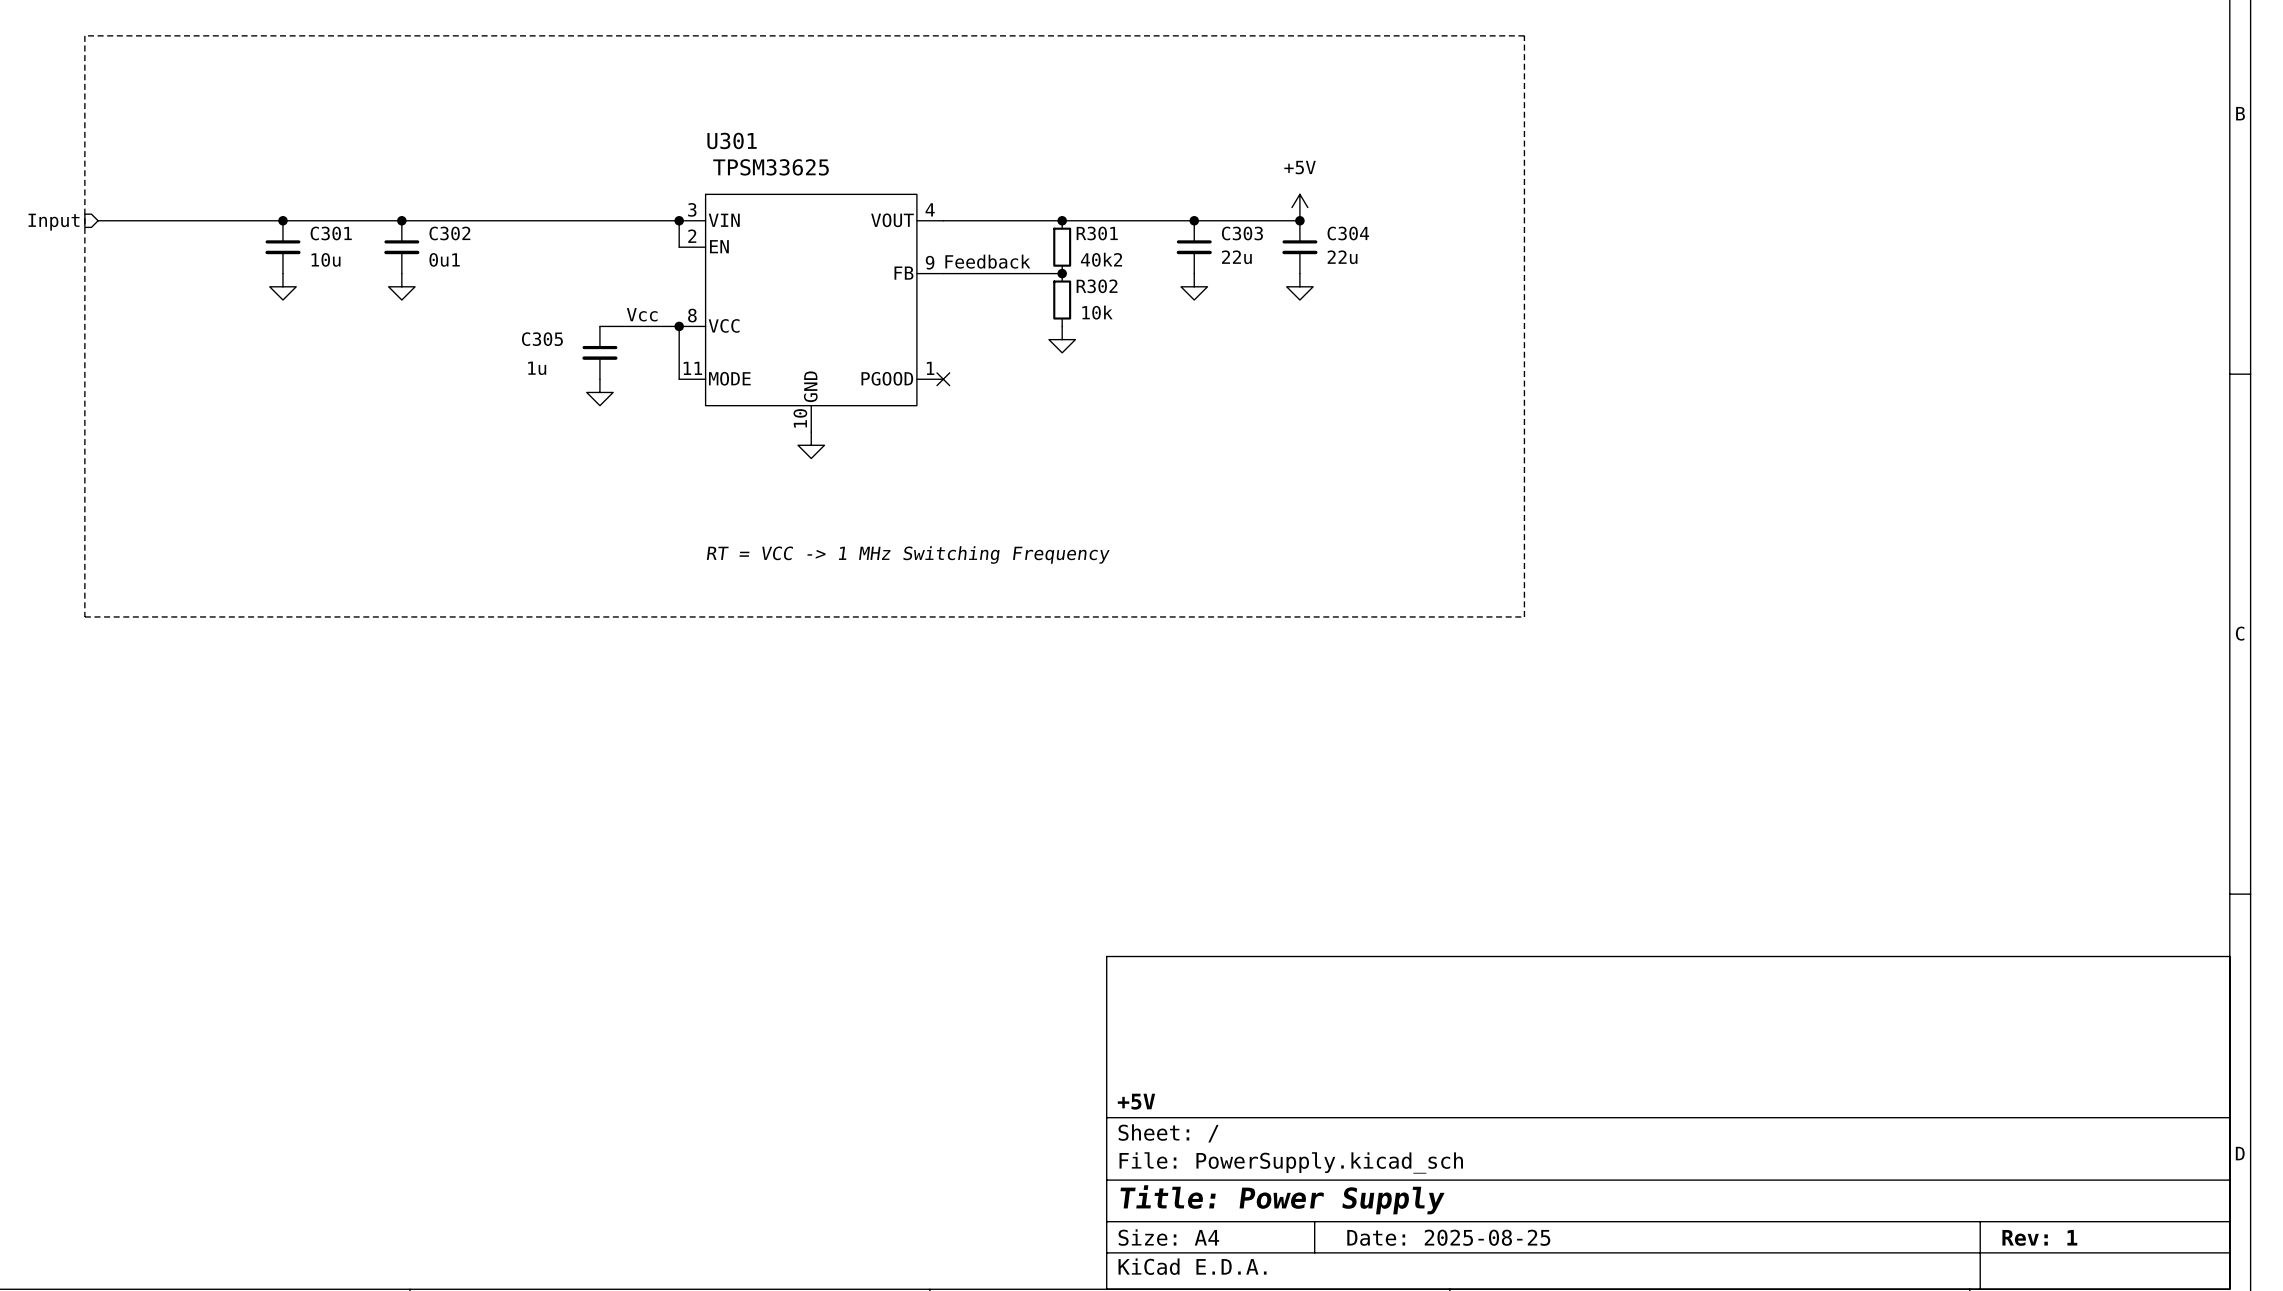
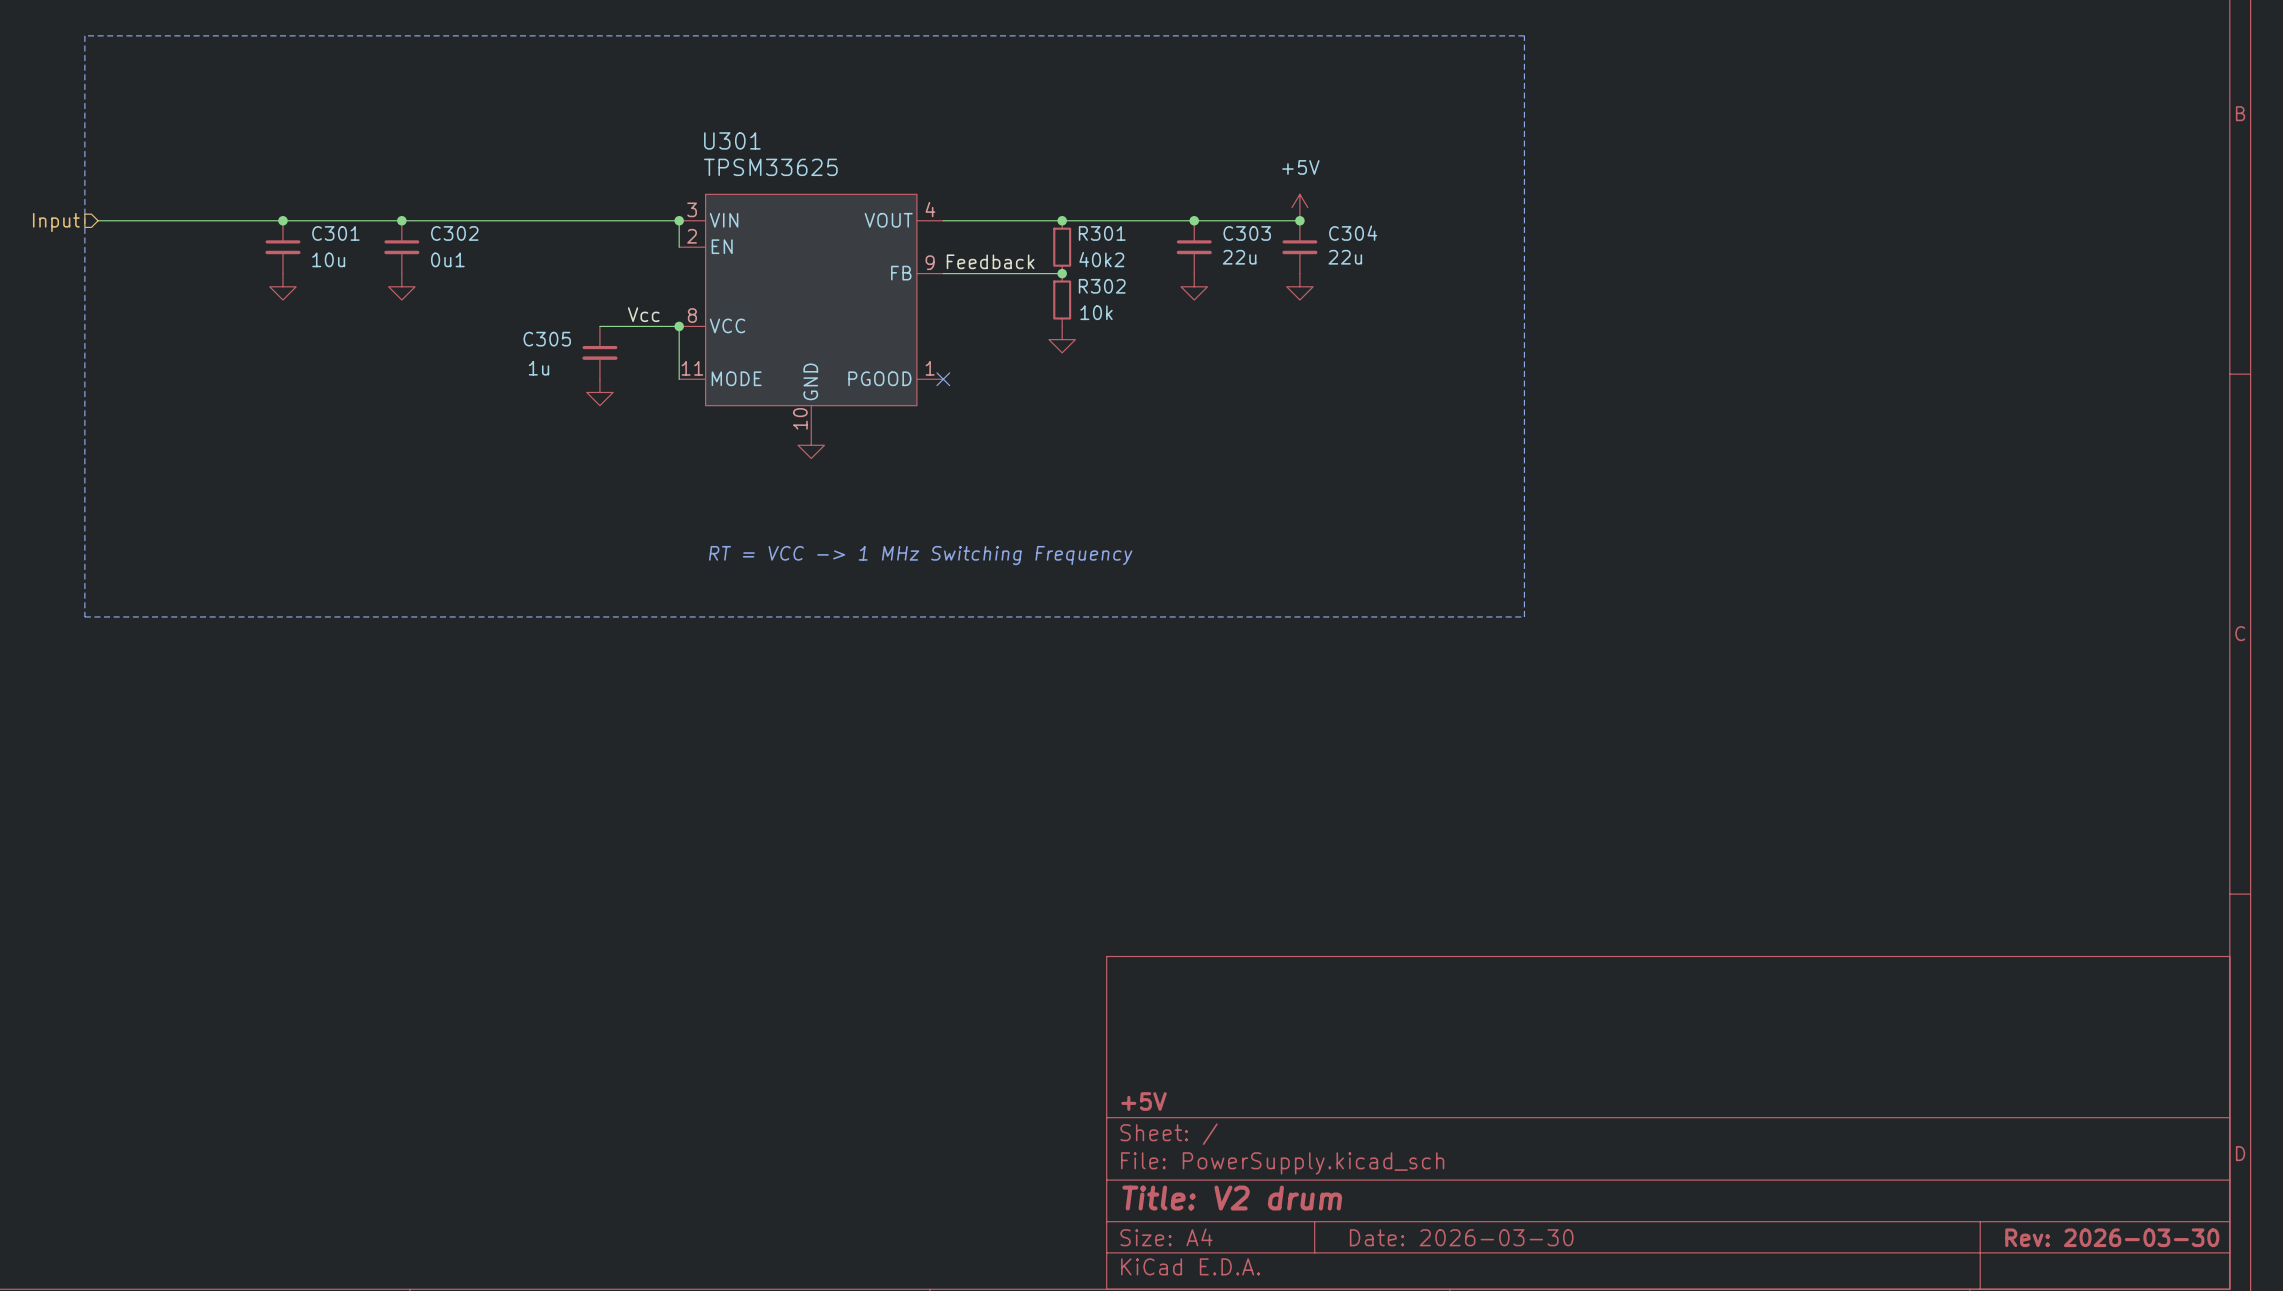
title block: Title: Power Supply (1282, 1199) -> Title: V2 drum (1232, 1198)
title block: Date: 2025-08-25 (1448, 1237) -> Date: 2026-03-30 (1461, 1237)
title block: Rev: 1 (2039, 1237) -> Rev: 2026-03-30 (2112, 1237)

